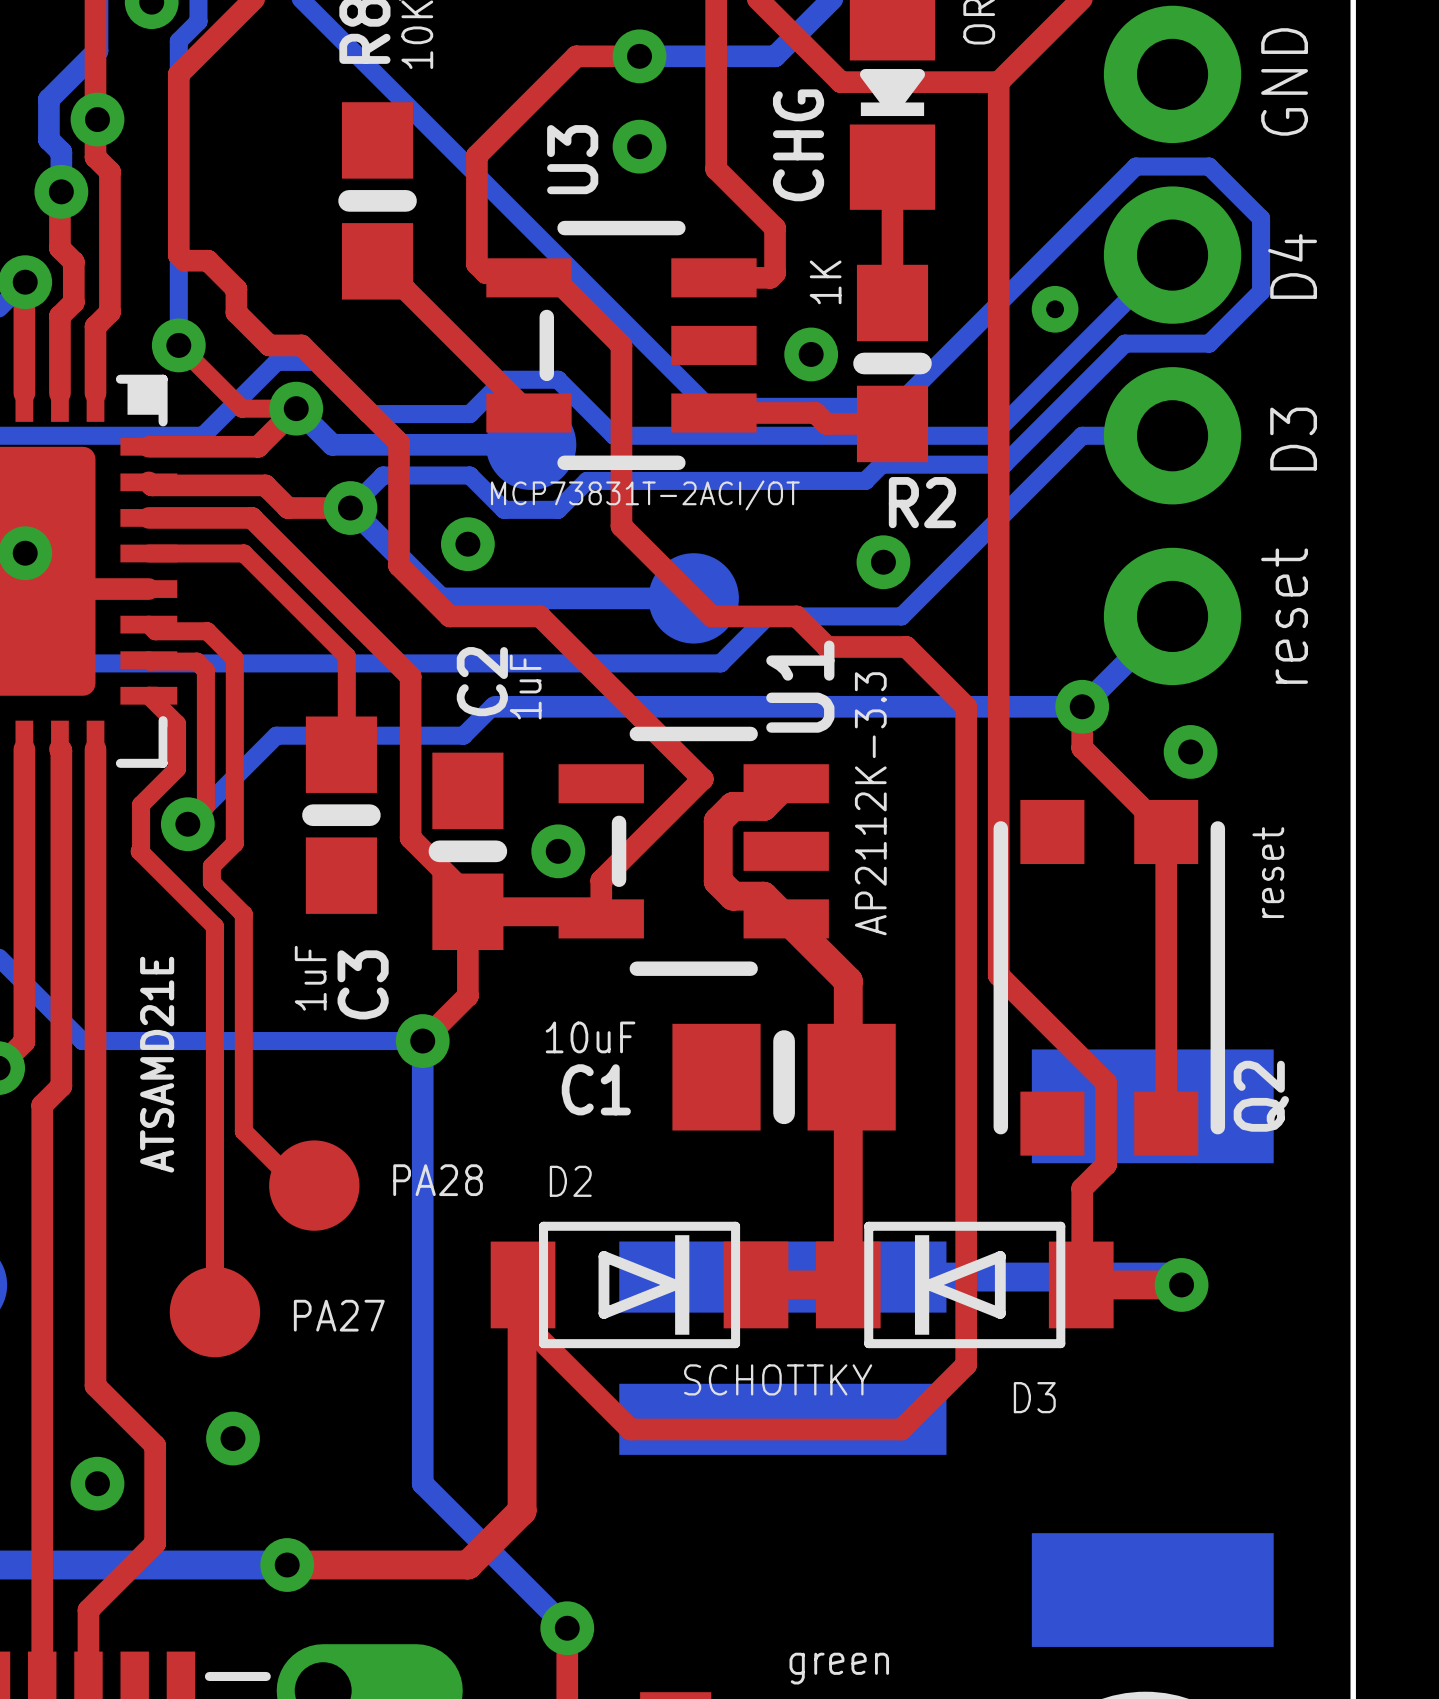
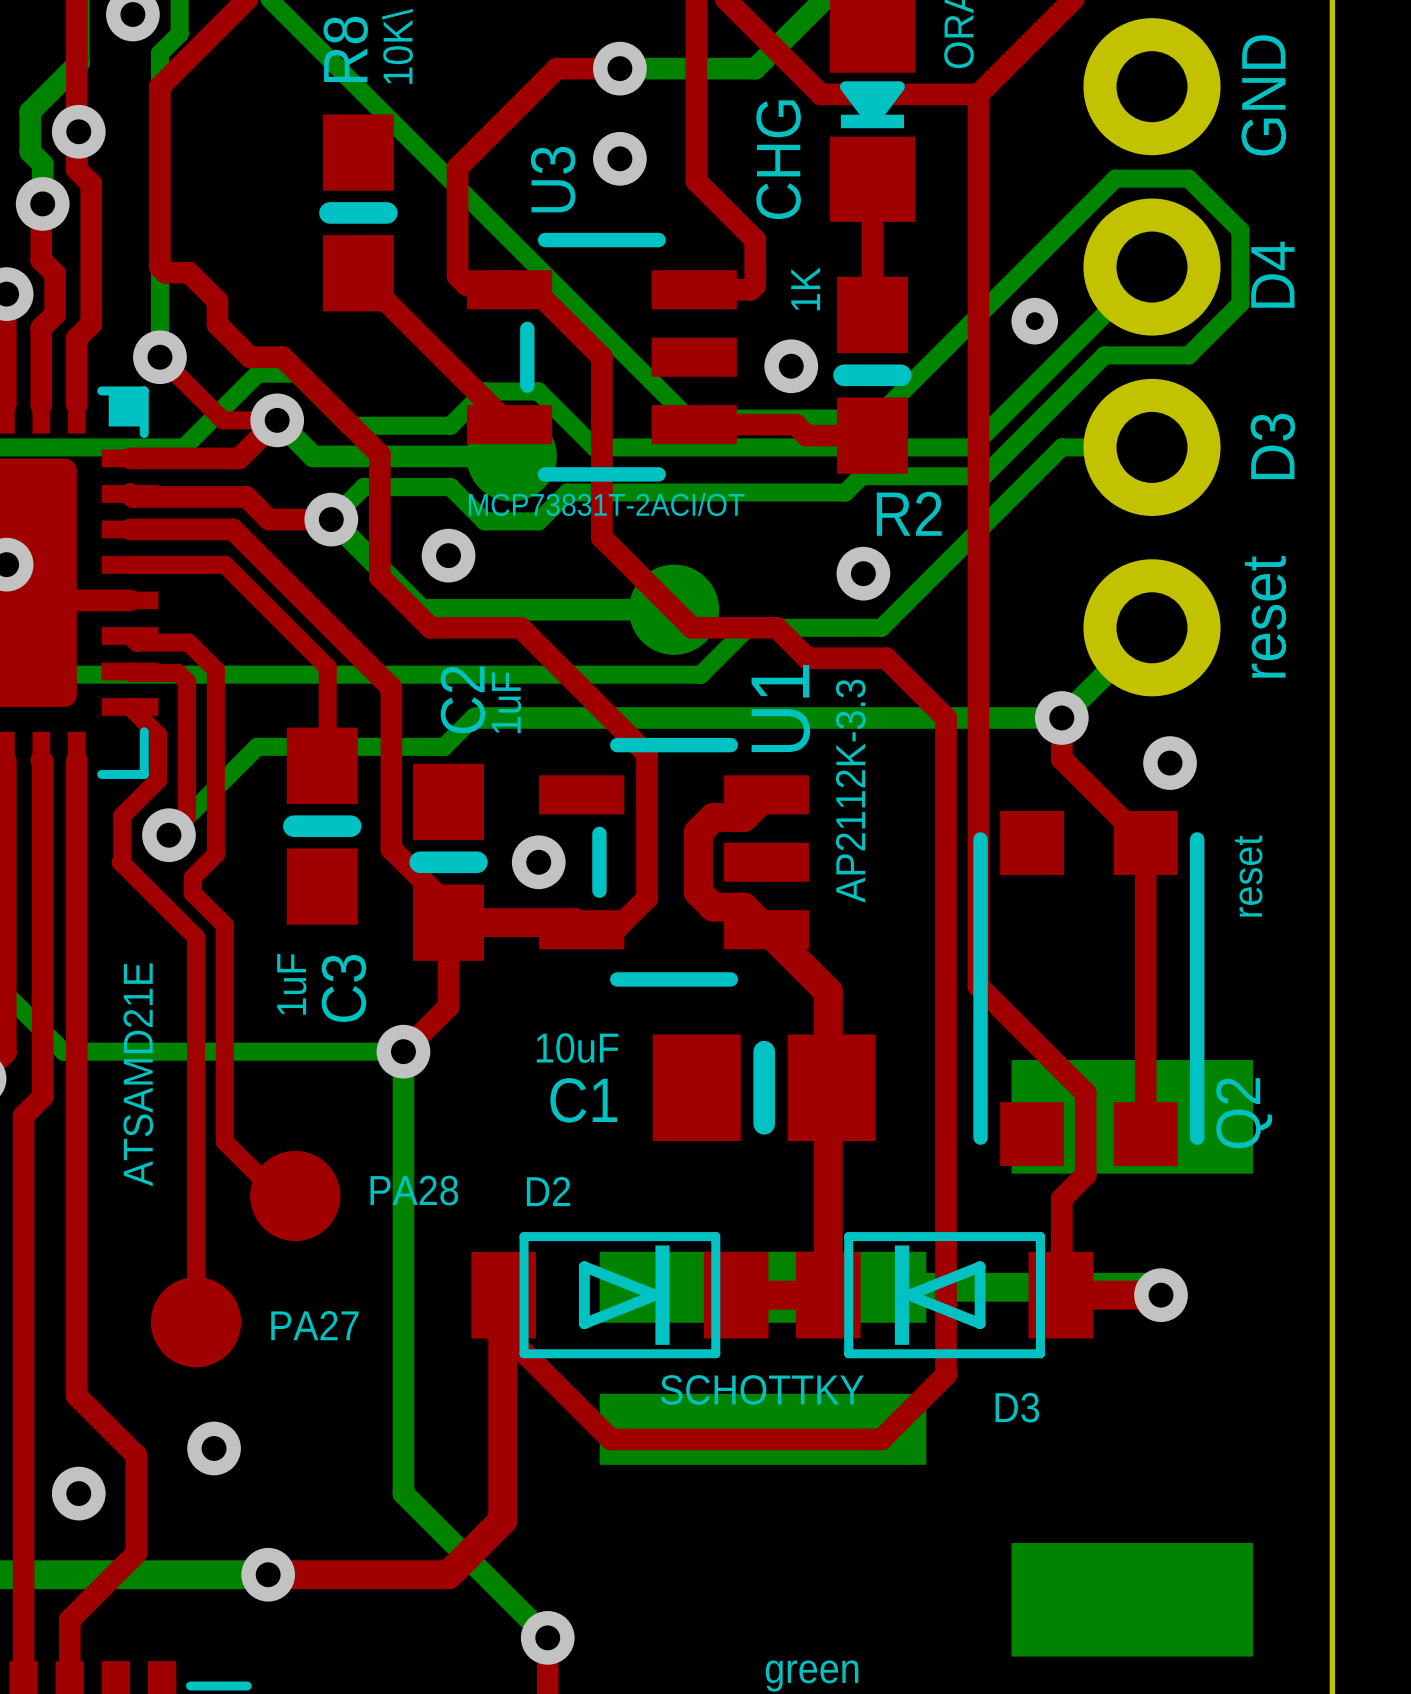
top track: (666, 742) (702, 779) (601, 880) (601, 918) -> (646, 754) (646, 898) (615, 929) (581, 929)

